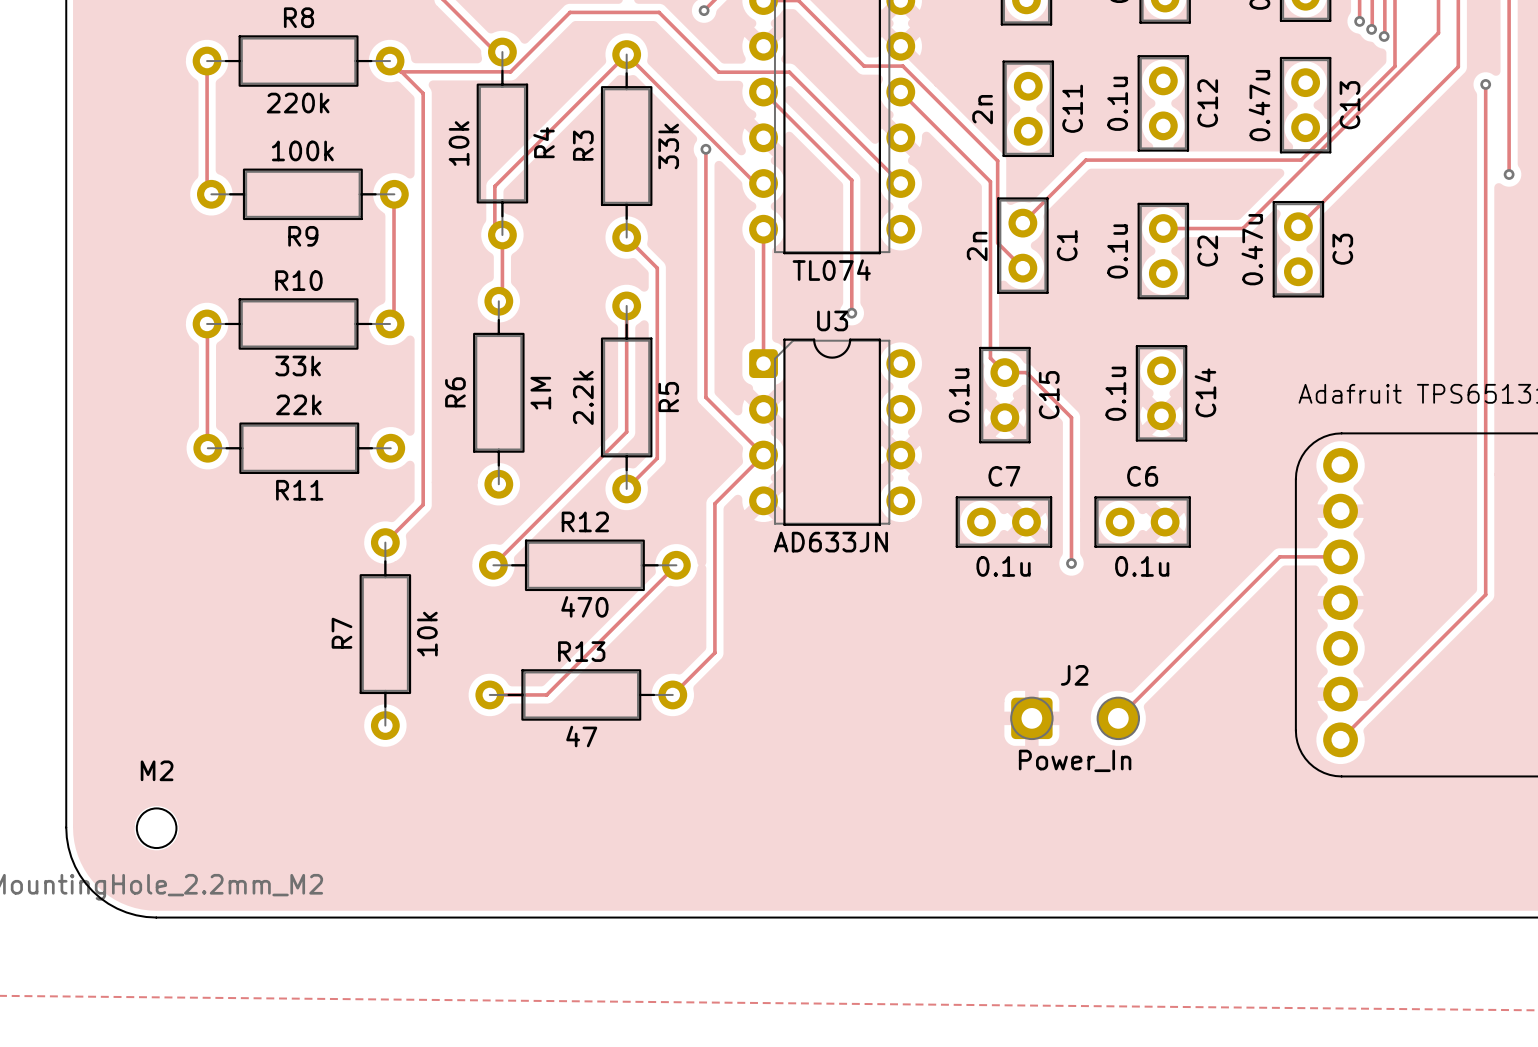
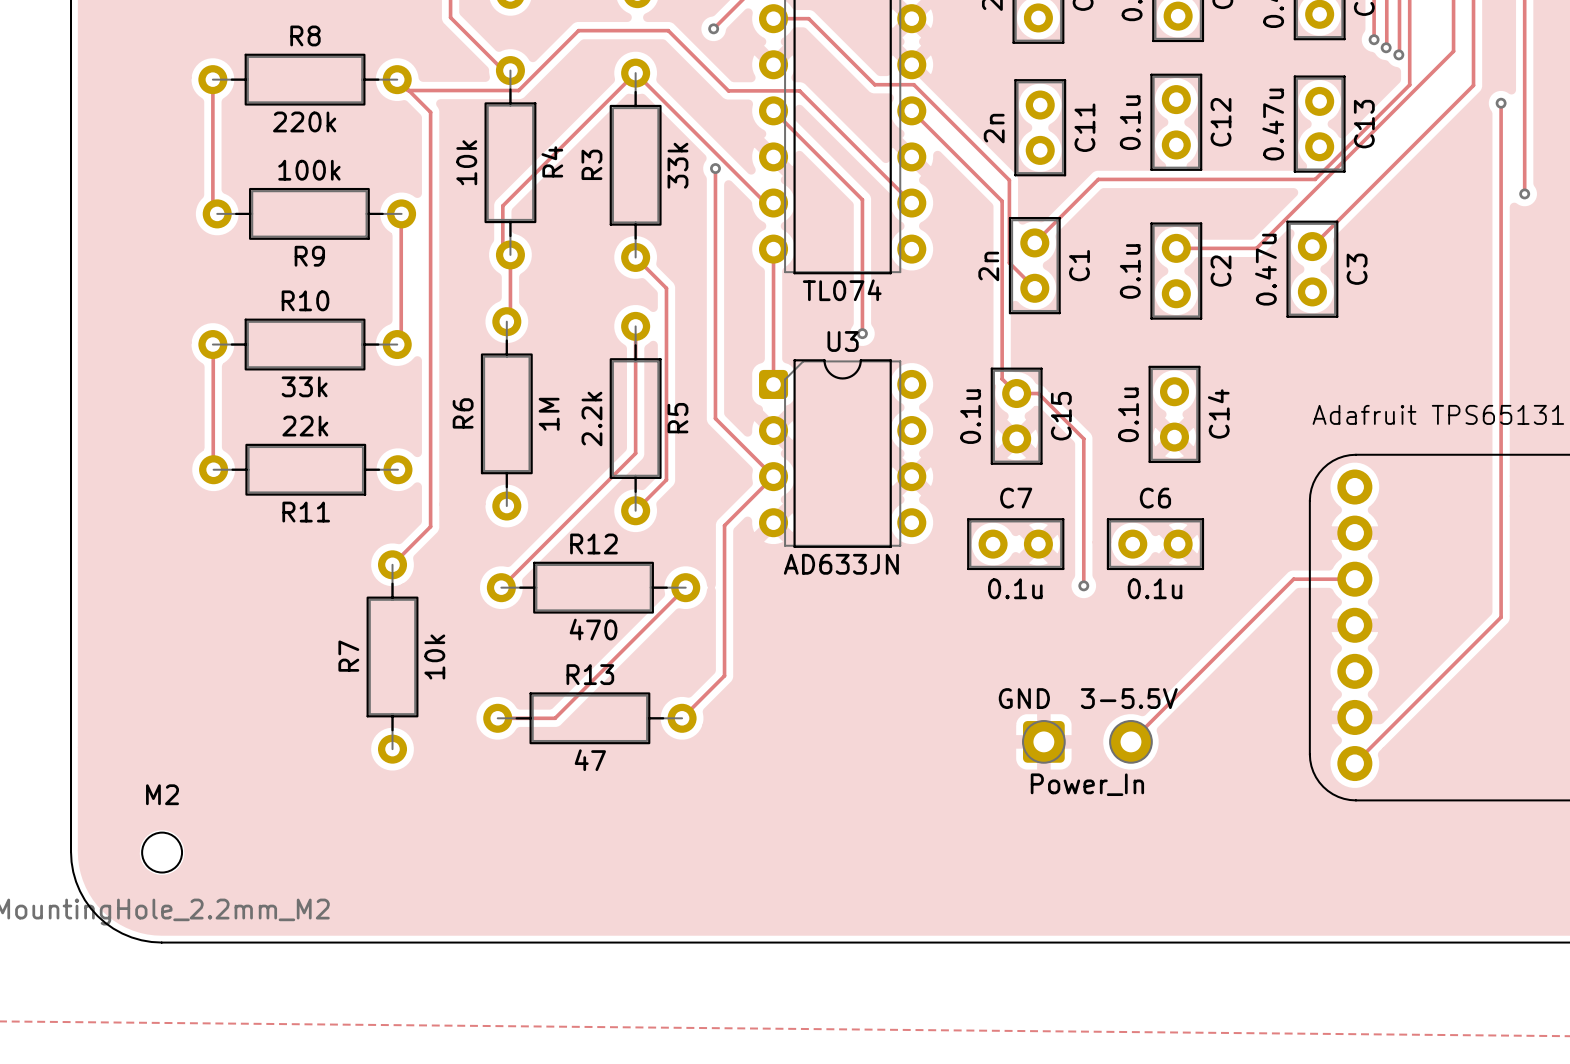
J2 name: J2 (1074, 675) -> GND 3-5.5V (1088, 698)

